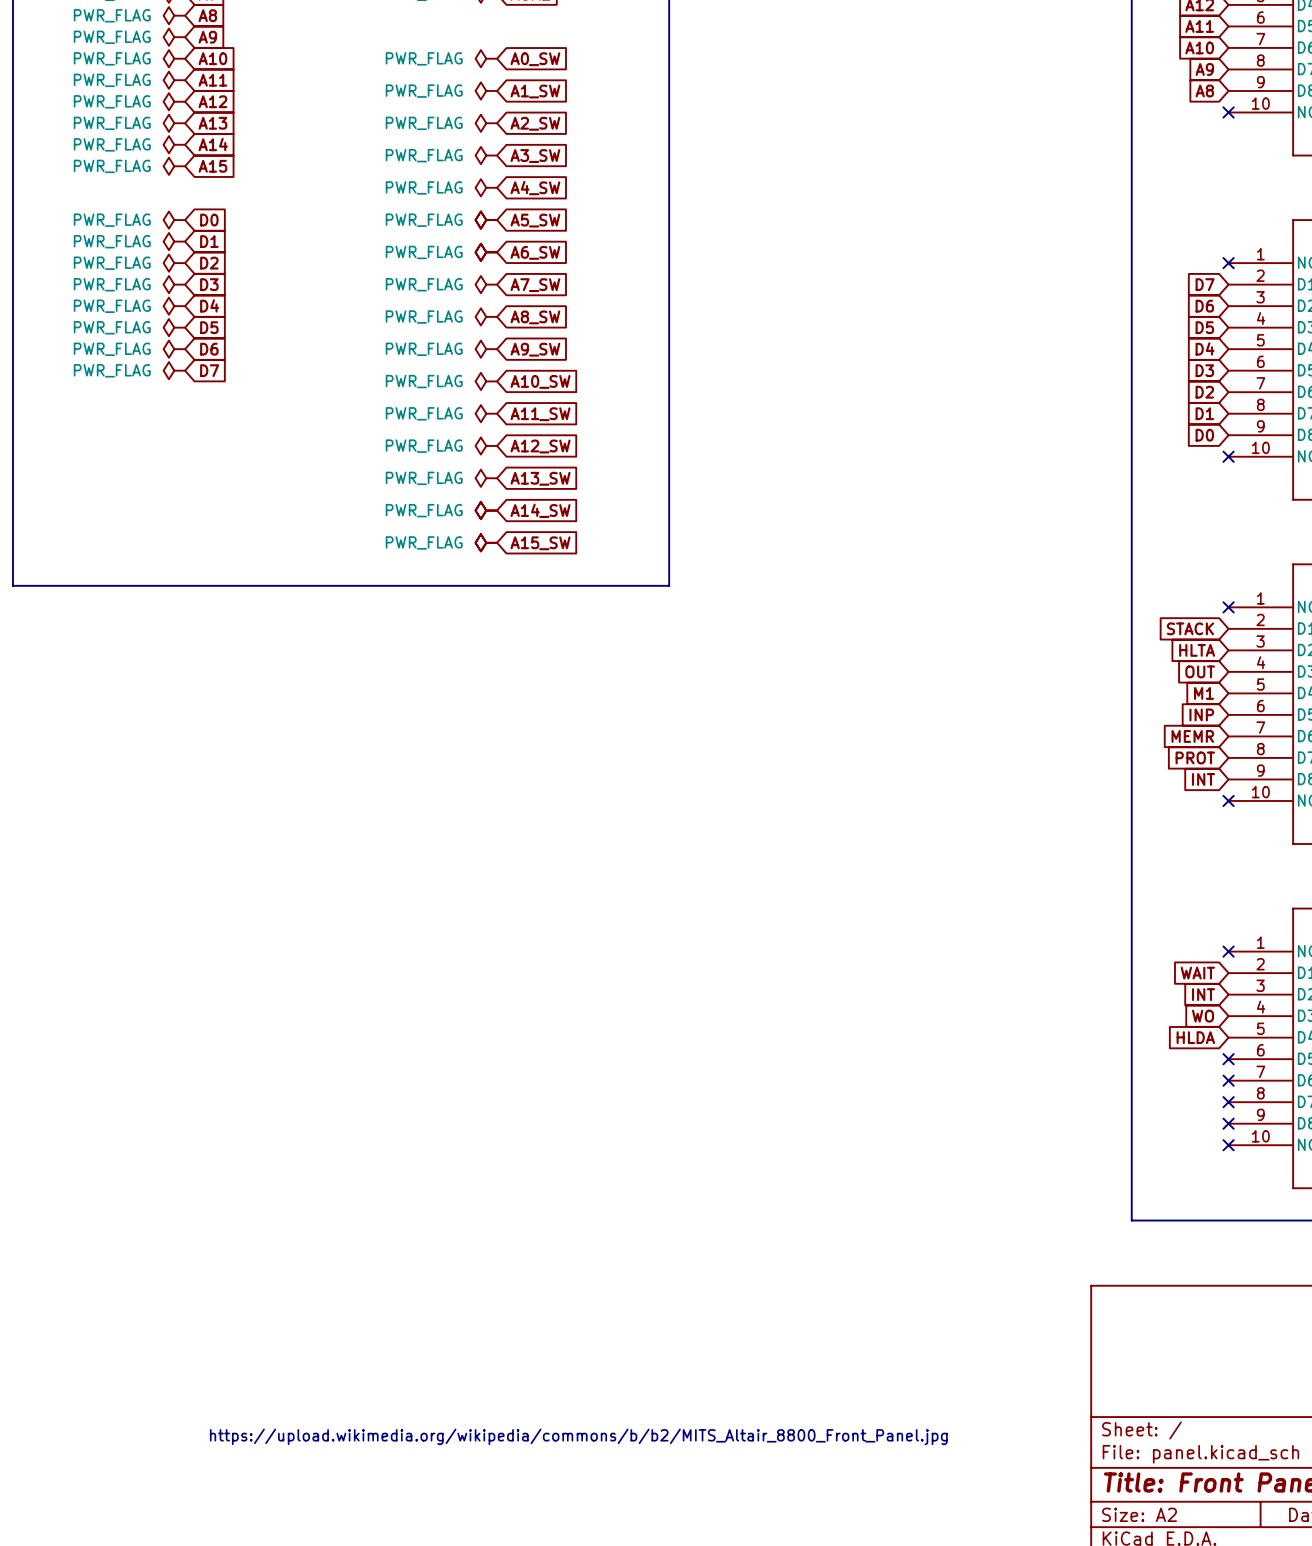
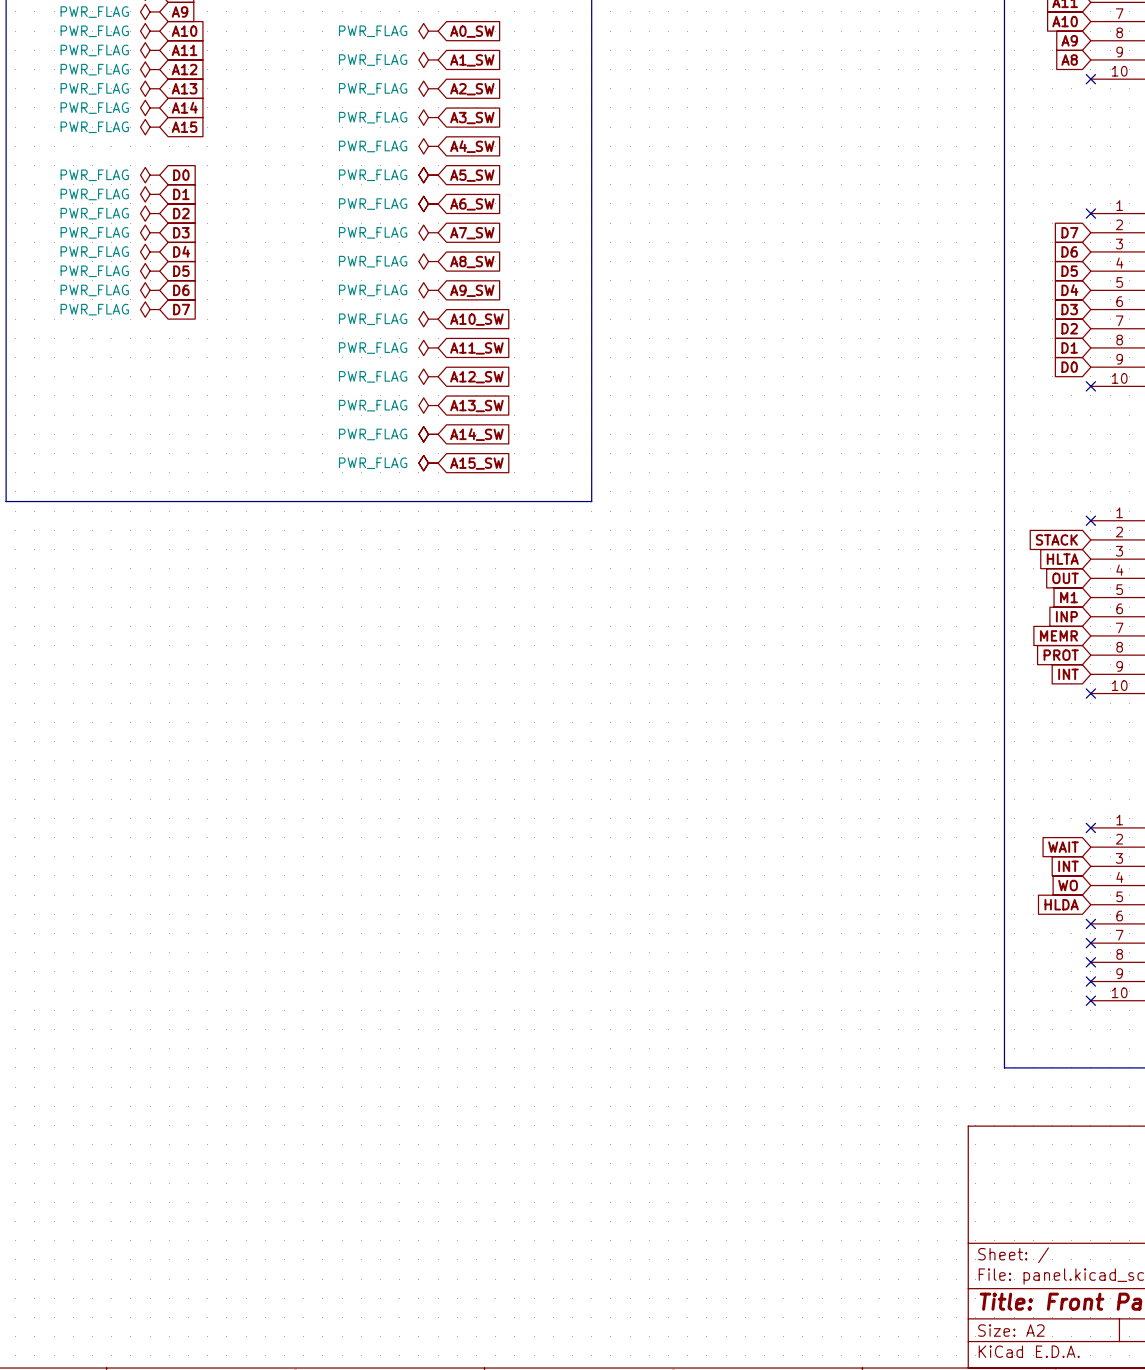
text: https://upload.wikimedia.org/wikipedia/commons/b/b2/MITS_Altair_8800_Front_Panel.jpg (578, 1436) -> none

